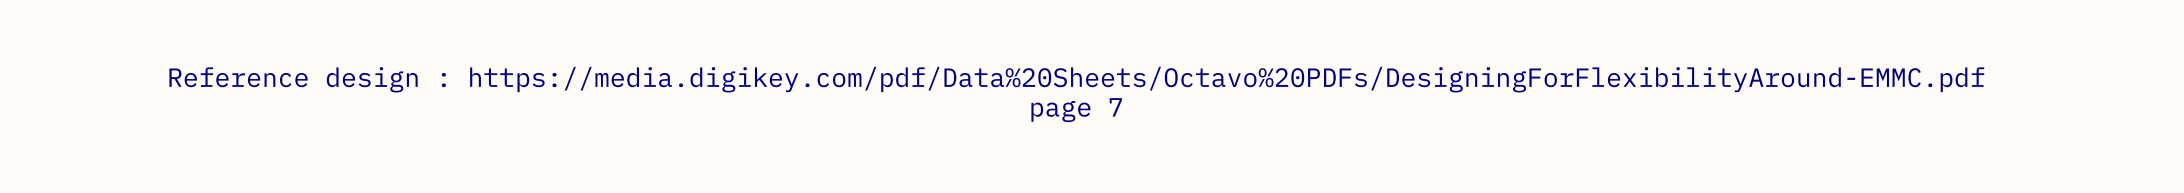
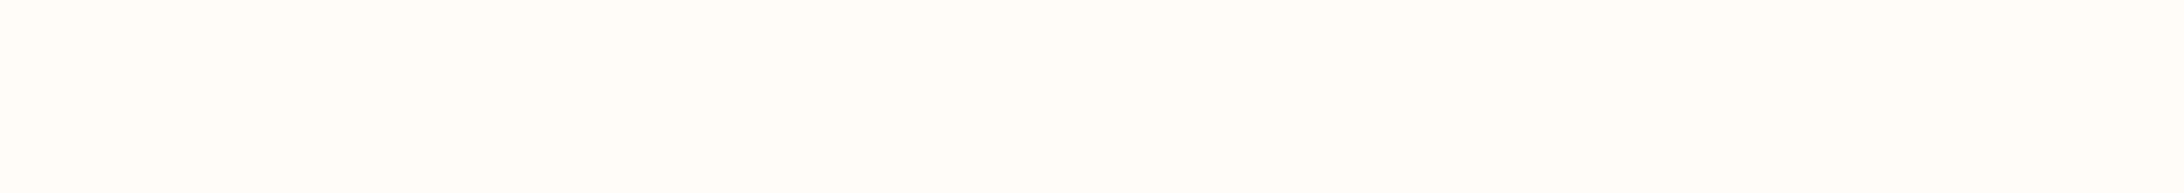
text: Reference design : https://media.digikey.com/pdf/Data%20Sheets/Octavo%20PDFs/DesigningForFlexibilityAround-EMMC.pdf (1076, 79) -> none
text: page 7 (1076, 110) -> none

